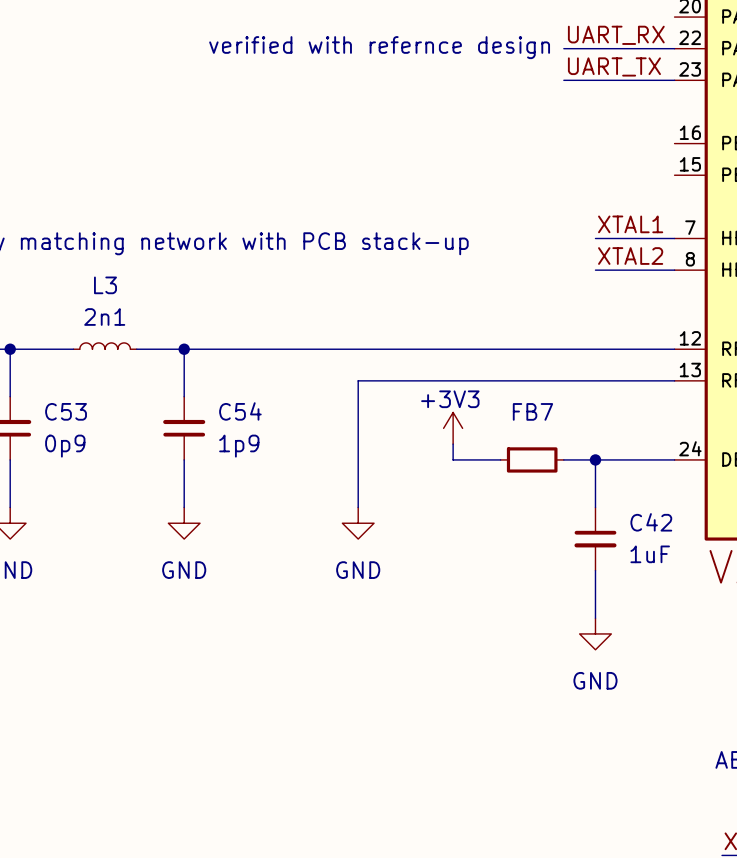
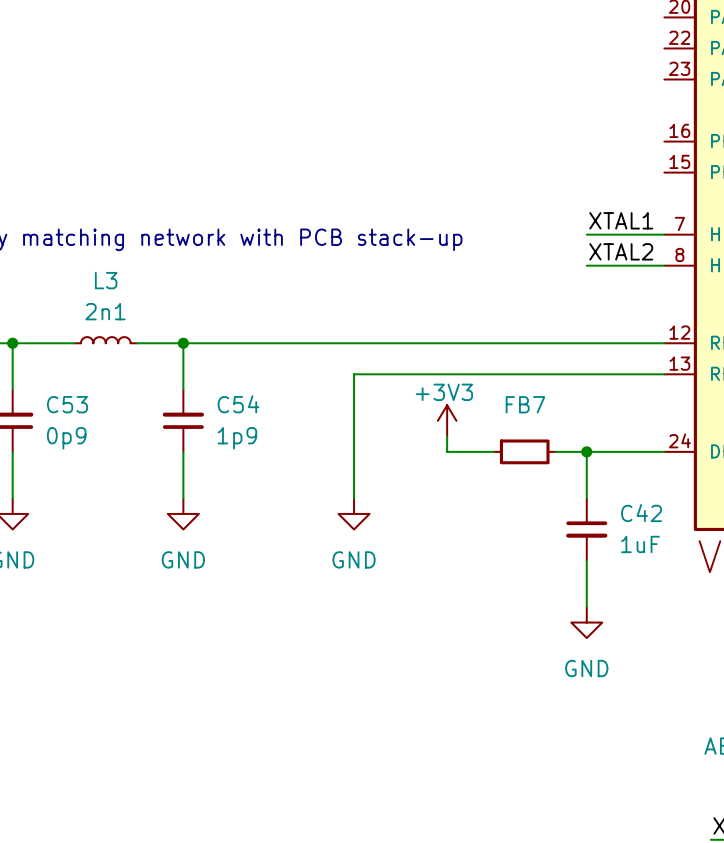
label: UART_RX (616, 35) -> none
text: verified with refernce design (379, 47) -> none
wire: (563, 48) (674, 48) -> none
label: UART_TX (614, 66) -> none
wire: (563, 80) (674, 80) -> none

